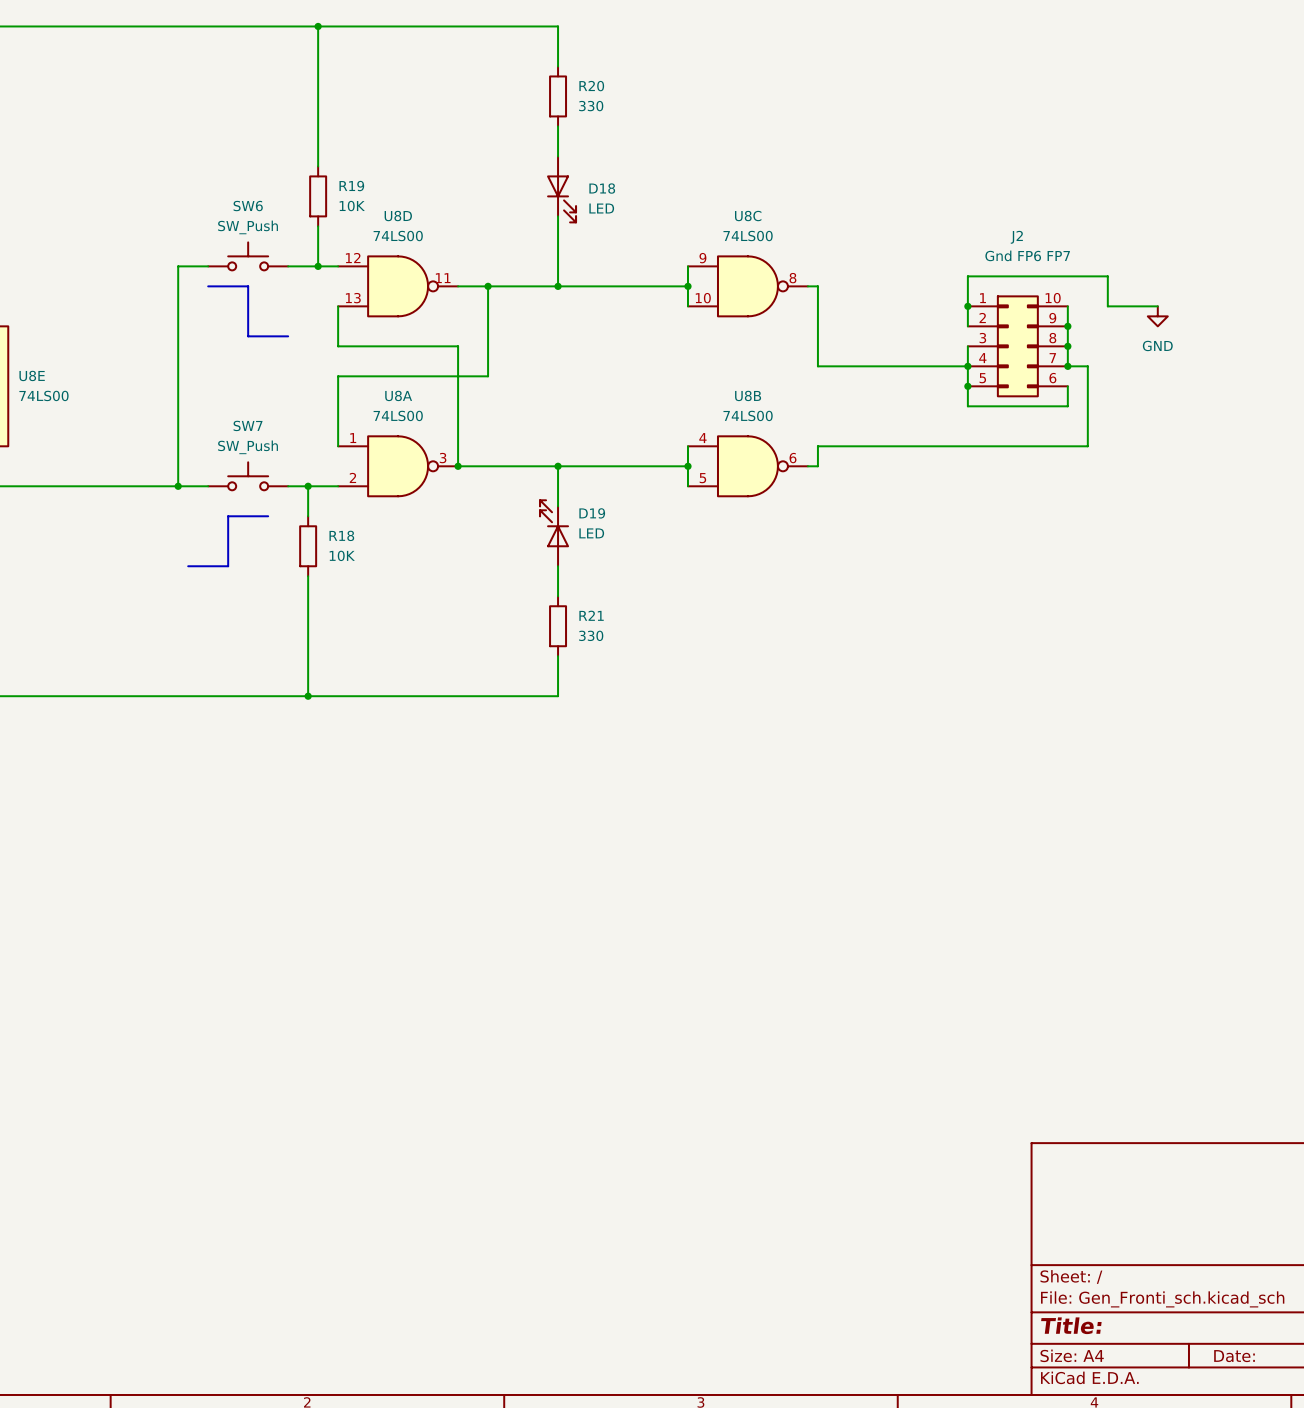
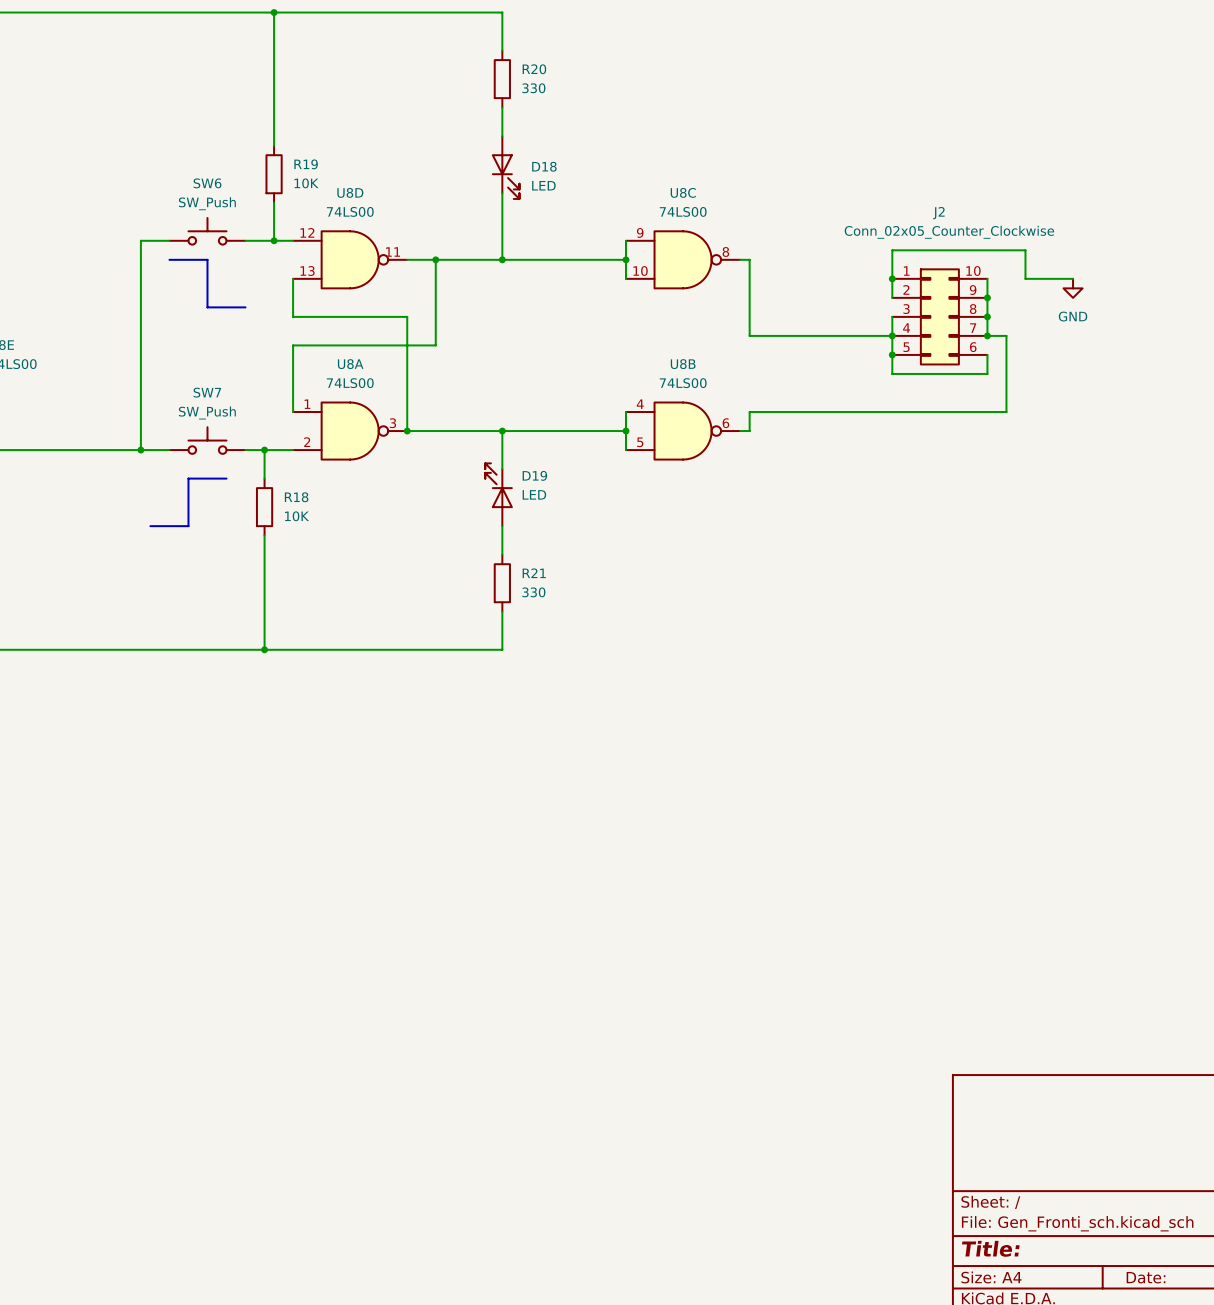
J2 value: Gnd FP6 FP7 (1027, 255) -> Conn_02x05_Counter_Clockwise (949, 232)

